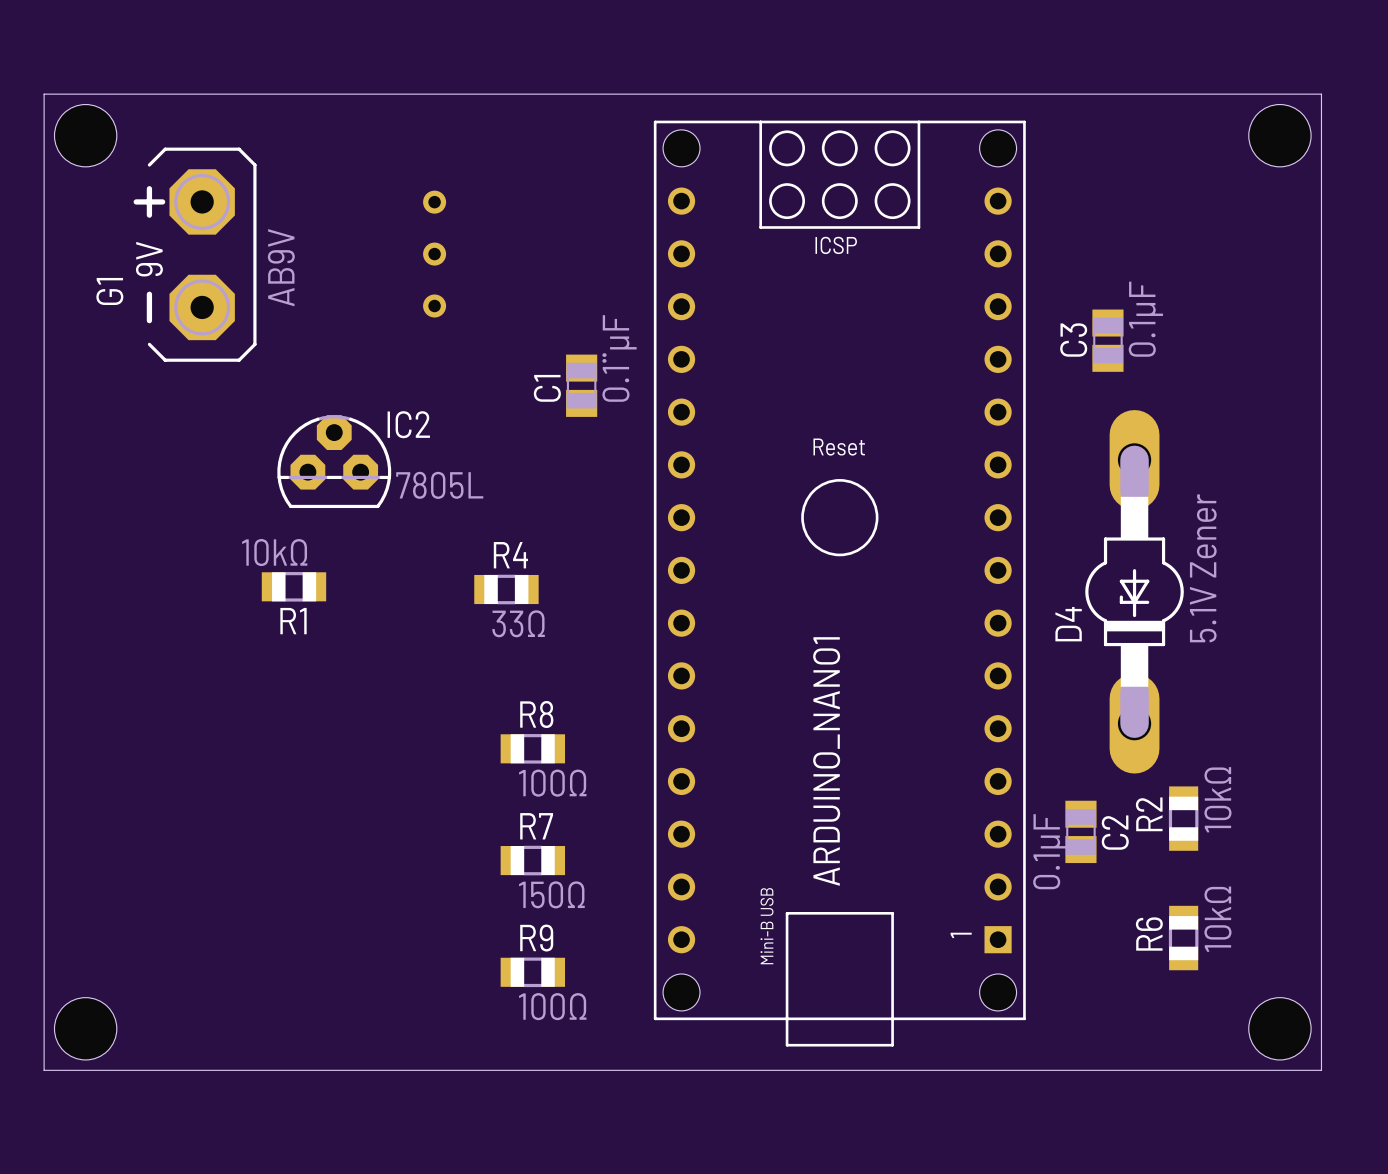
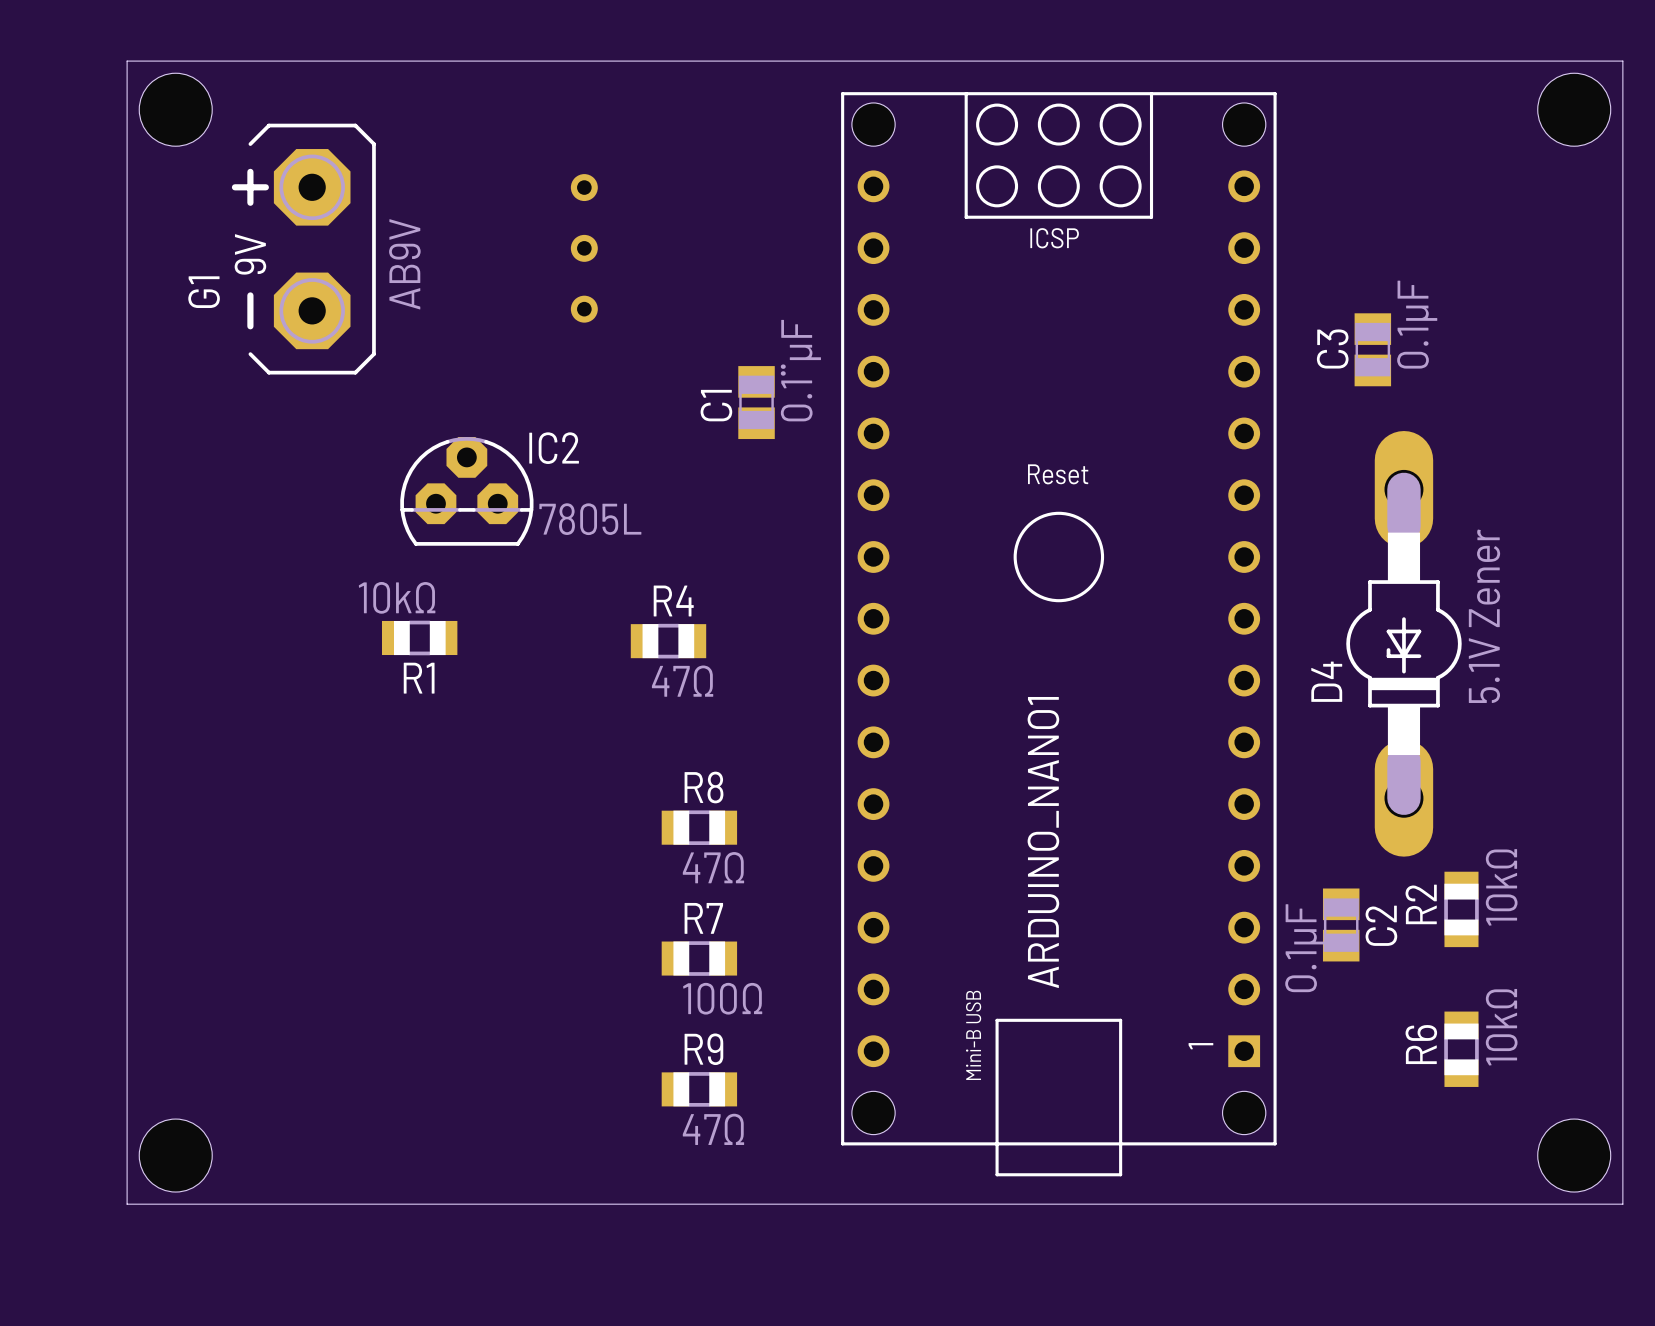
R4 value: 33Ω (518, 623) -> 47Ω (682, 681)
R8 value: 100Ω (552, 783) -> 47Ω (713, 867)
R7 value: 150Ω (551, 894) -> 100Ω (722, 998)
R9 value: 100Ω (552, 1006) -> 47Ω (713, 1129)

